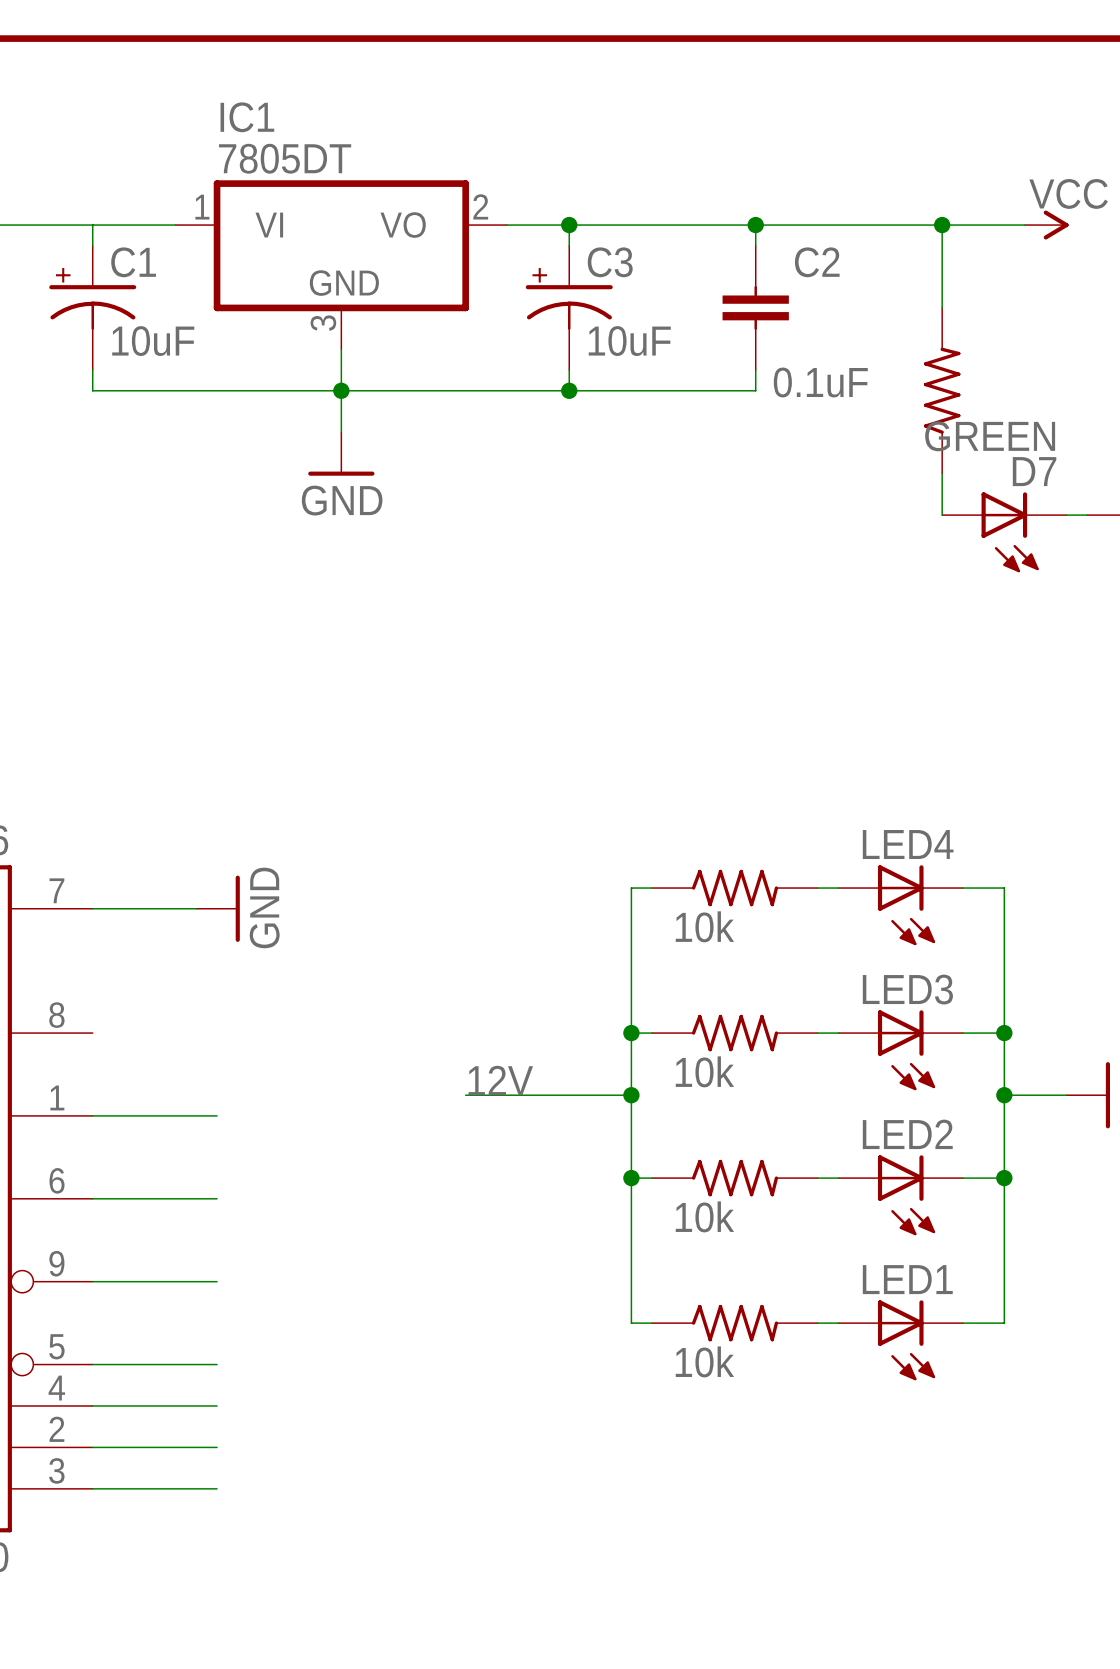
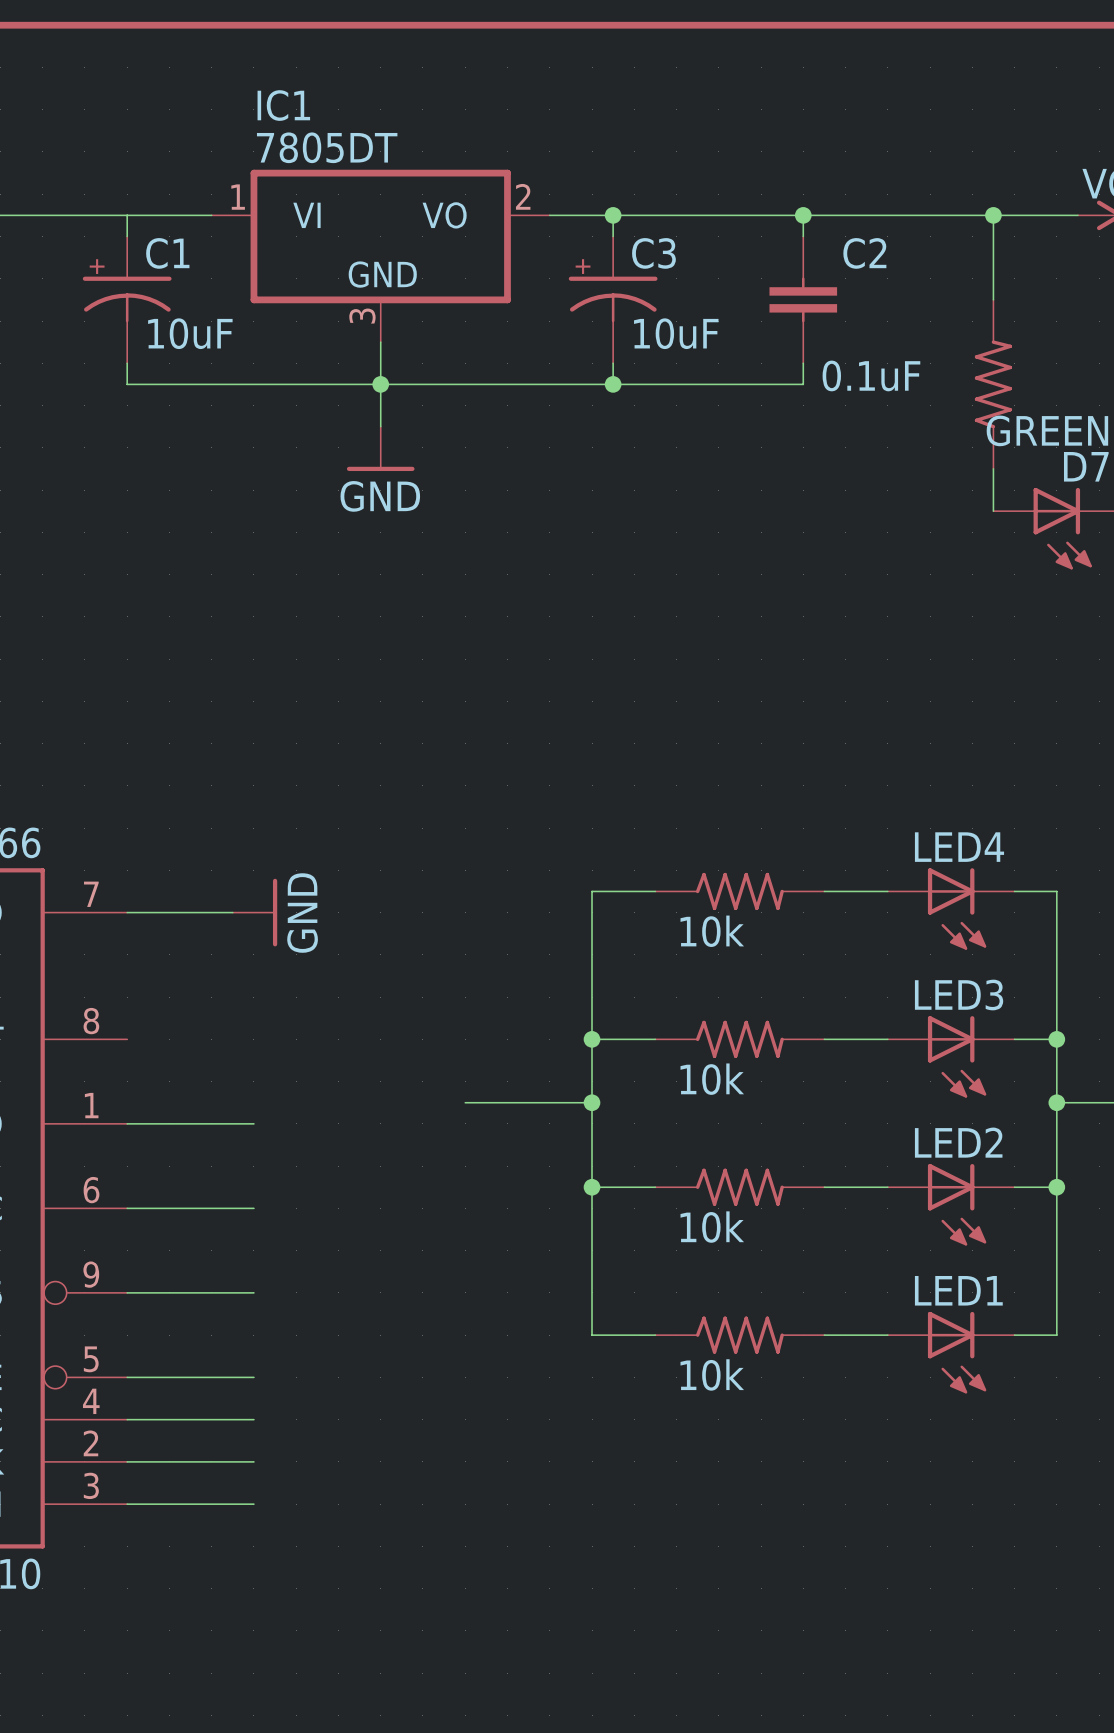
wire: none -> (655, 891) (592, 891) (592, 1335) (655, 1335)
wire: (652, 888) (631, 888) (631, 1323) (652, 1323) -> none
part position: (735, 888) -> (739, 891)
wire: none -> (592, 1039) (655, 1039)
junction: none -> (592, 1039)
junction: (631, 1033) -> none
part position: (735, 1033) -> (739, 1039)
label: 12V (500, 1080) -> none
wire: none -> (465, 1102) (507, 1102)
wire: (548, 1095) (631, 1095) -> none
junction: none -> (592, 1102)
junction: (631, 1095) -> none
wire: none -> (592, 1187) (655, 1187)
junction: none -> (592, 1187)
junction: (631, 1178) -> none
part position: (735, 1178) -> (739, 1187)
part position: (735, 1323) -> (739, 1335)

